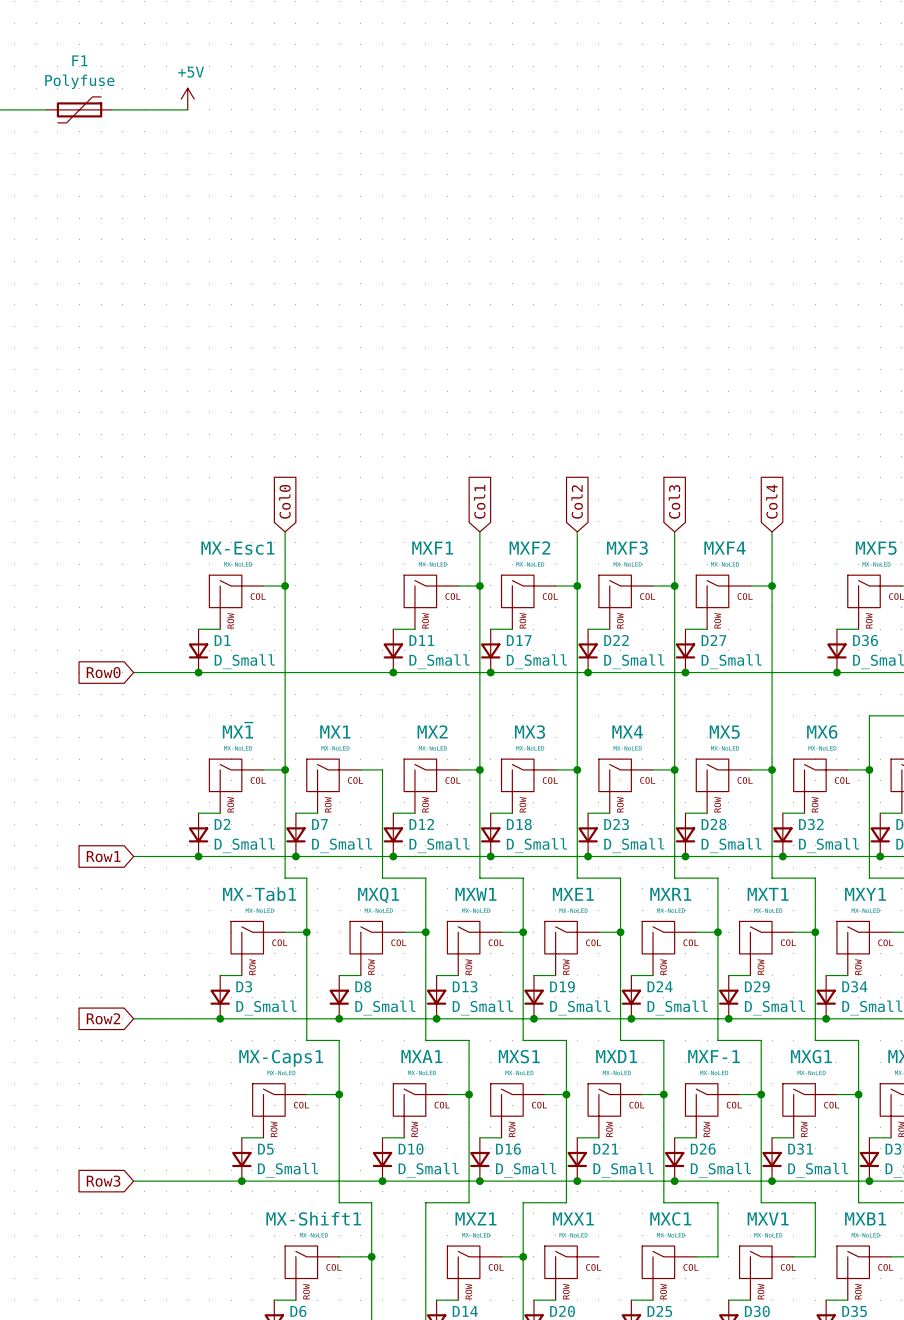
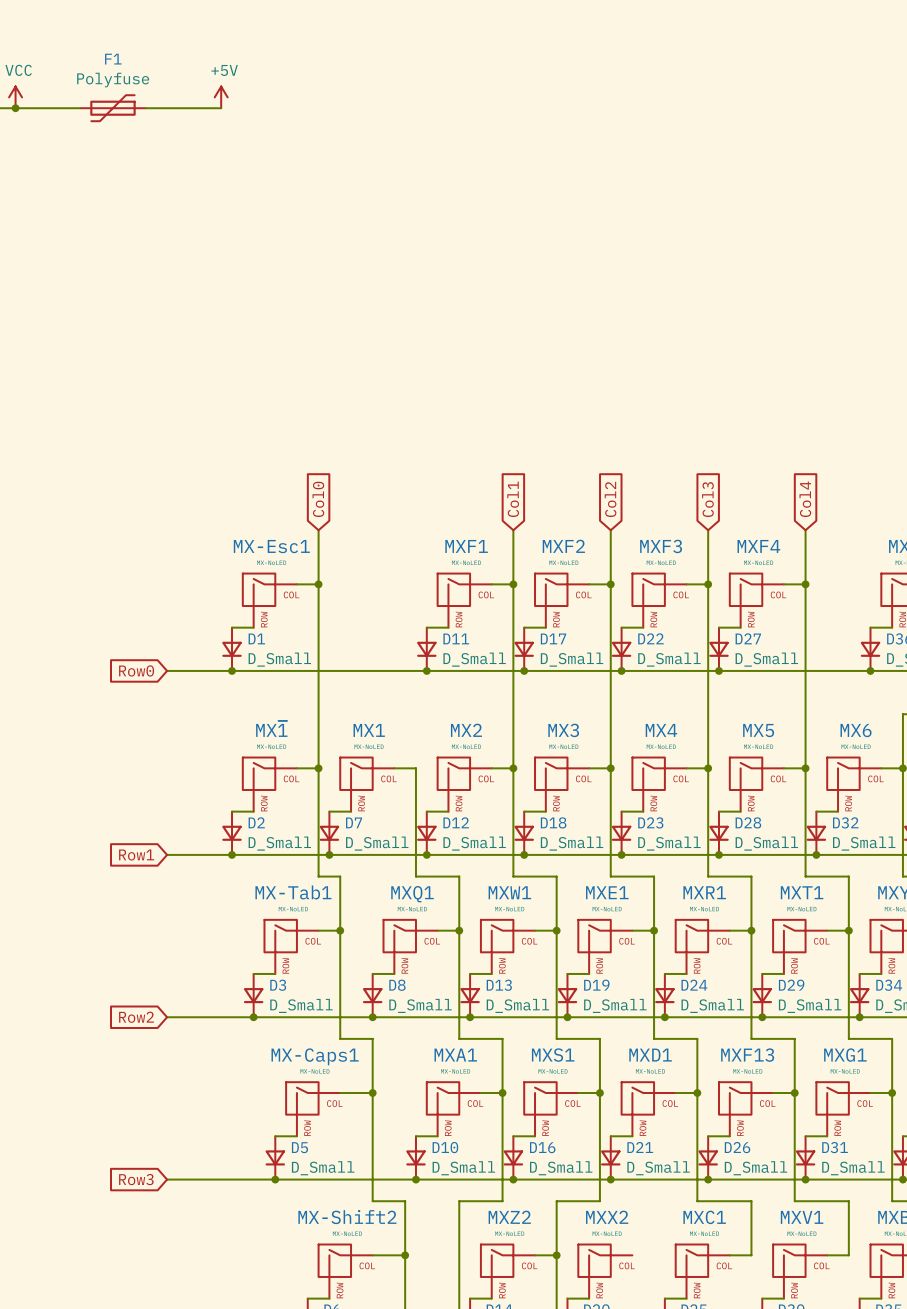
MXF-1 name: MXF-1 (714, 1056) -> MXF13 (747, 1055)
MX-Shift1 name: MX-Shift1 (313, 1218) -> MX-Shift2 (347, 1217)
MXZ1 name: MXZ1 (475, 1218) -> MXZ2 (509, 1217)
MXX1 name: MXX1 (573, 1218) -> MXX2 (607, 1217)

